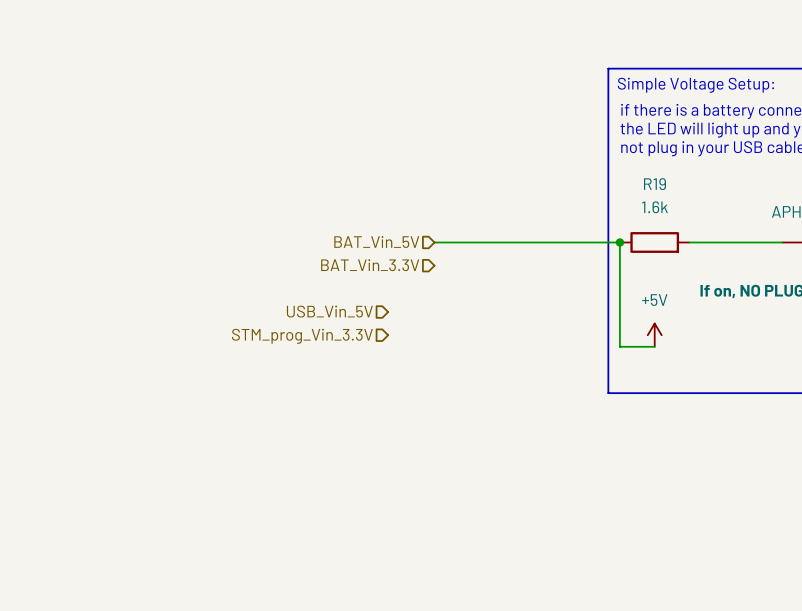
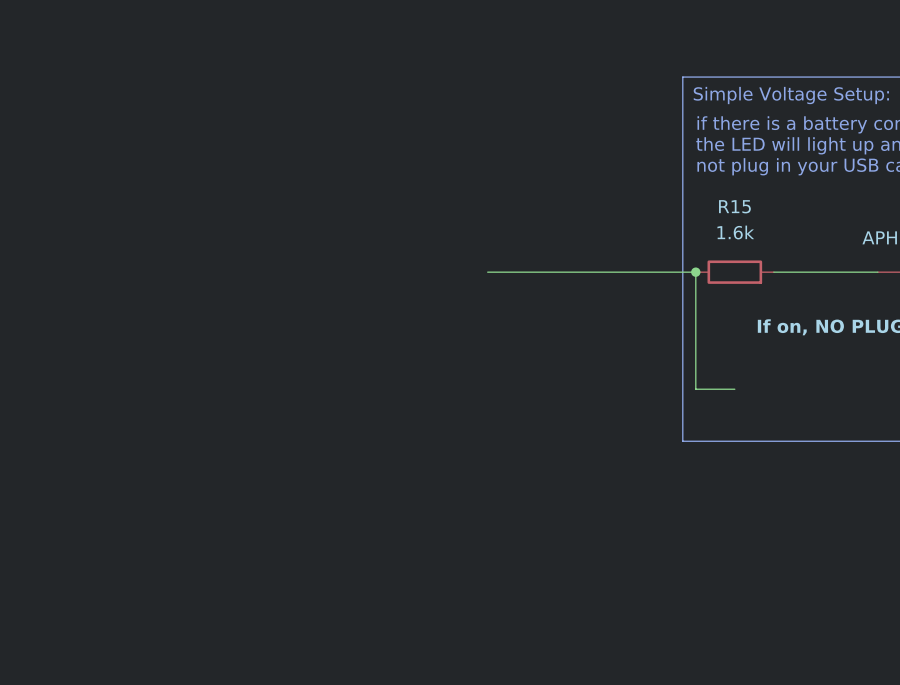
R19 name: R19 (654, 184) -> R15 (734, 206)
hierarchical label: BAT_Vin_5V (376, 242) -> none
hierarchical label: BAT_Vin_3.3V (370, 265) -> none
hierarchical label: USB_Vin_5V (329, 311) -> none
power symbol: +5V (654, 335) -> none
hierarchical label: STM_prog_Vin_3.3V (302, 336) -> none

